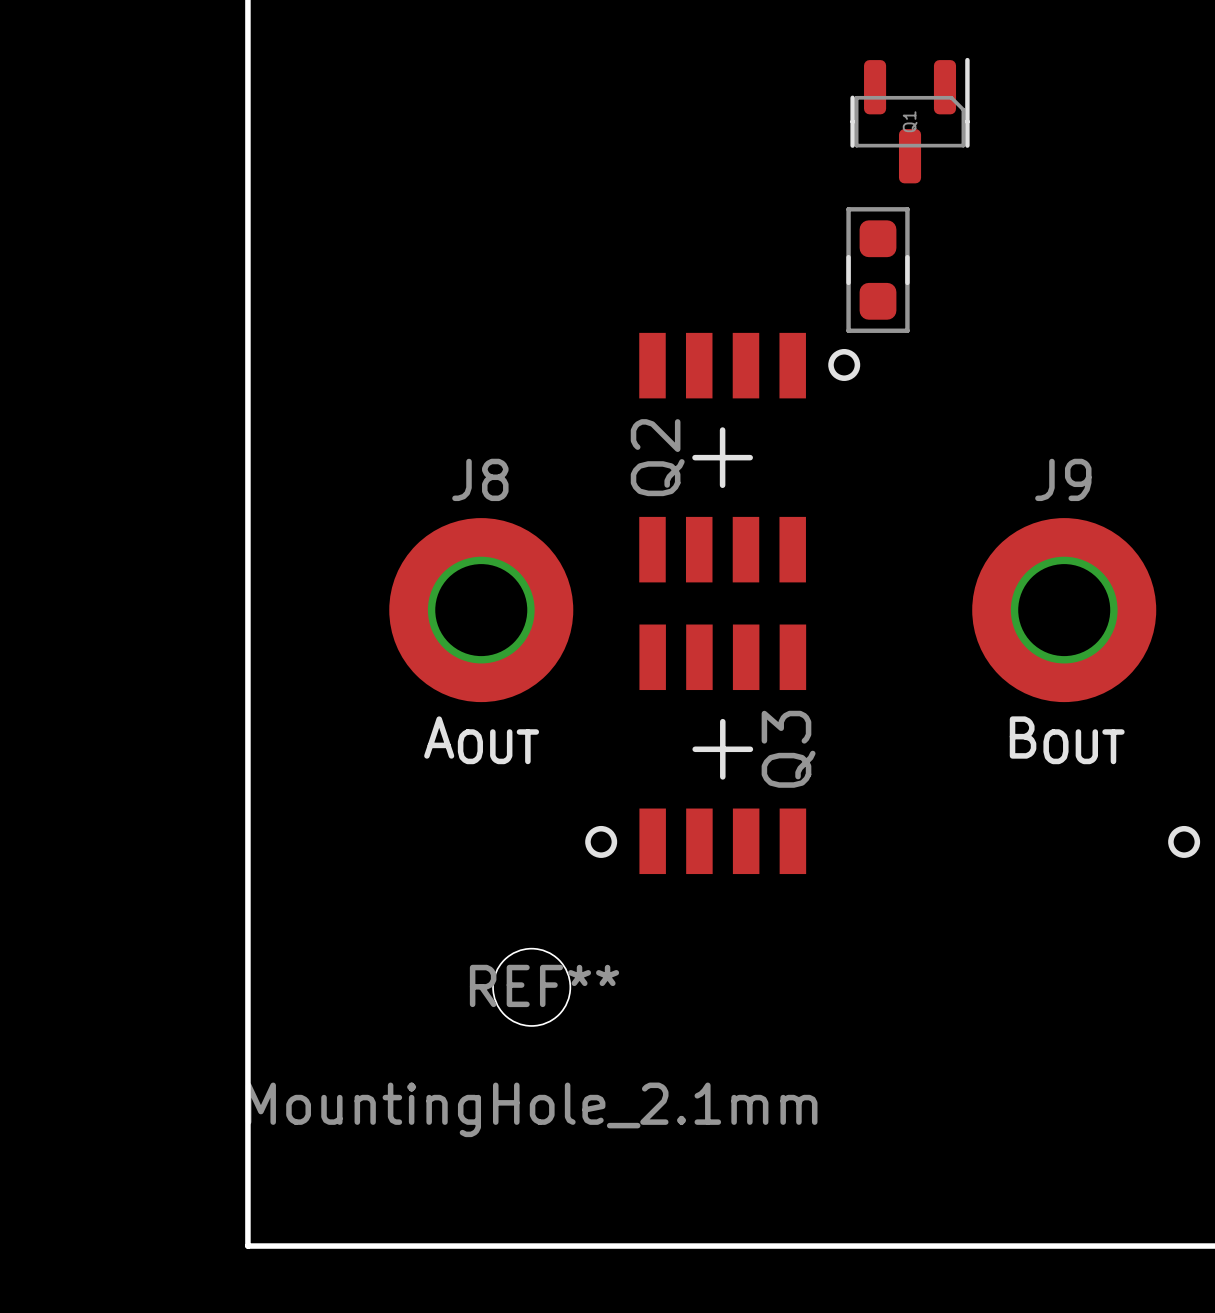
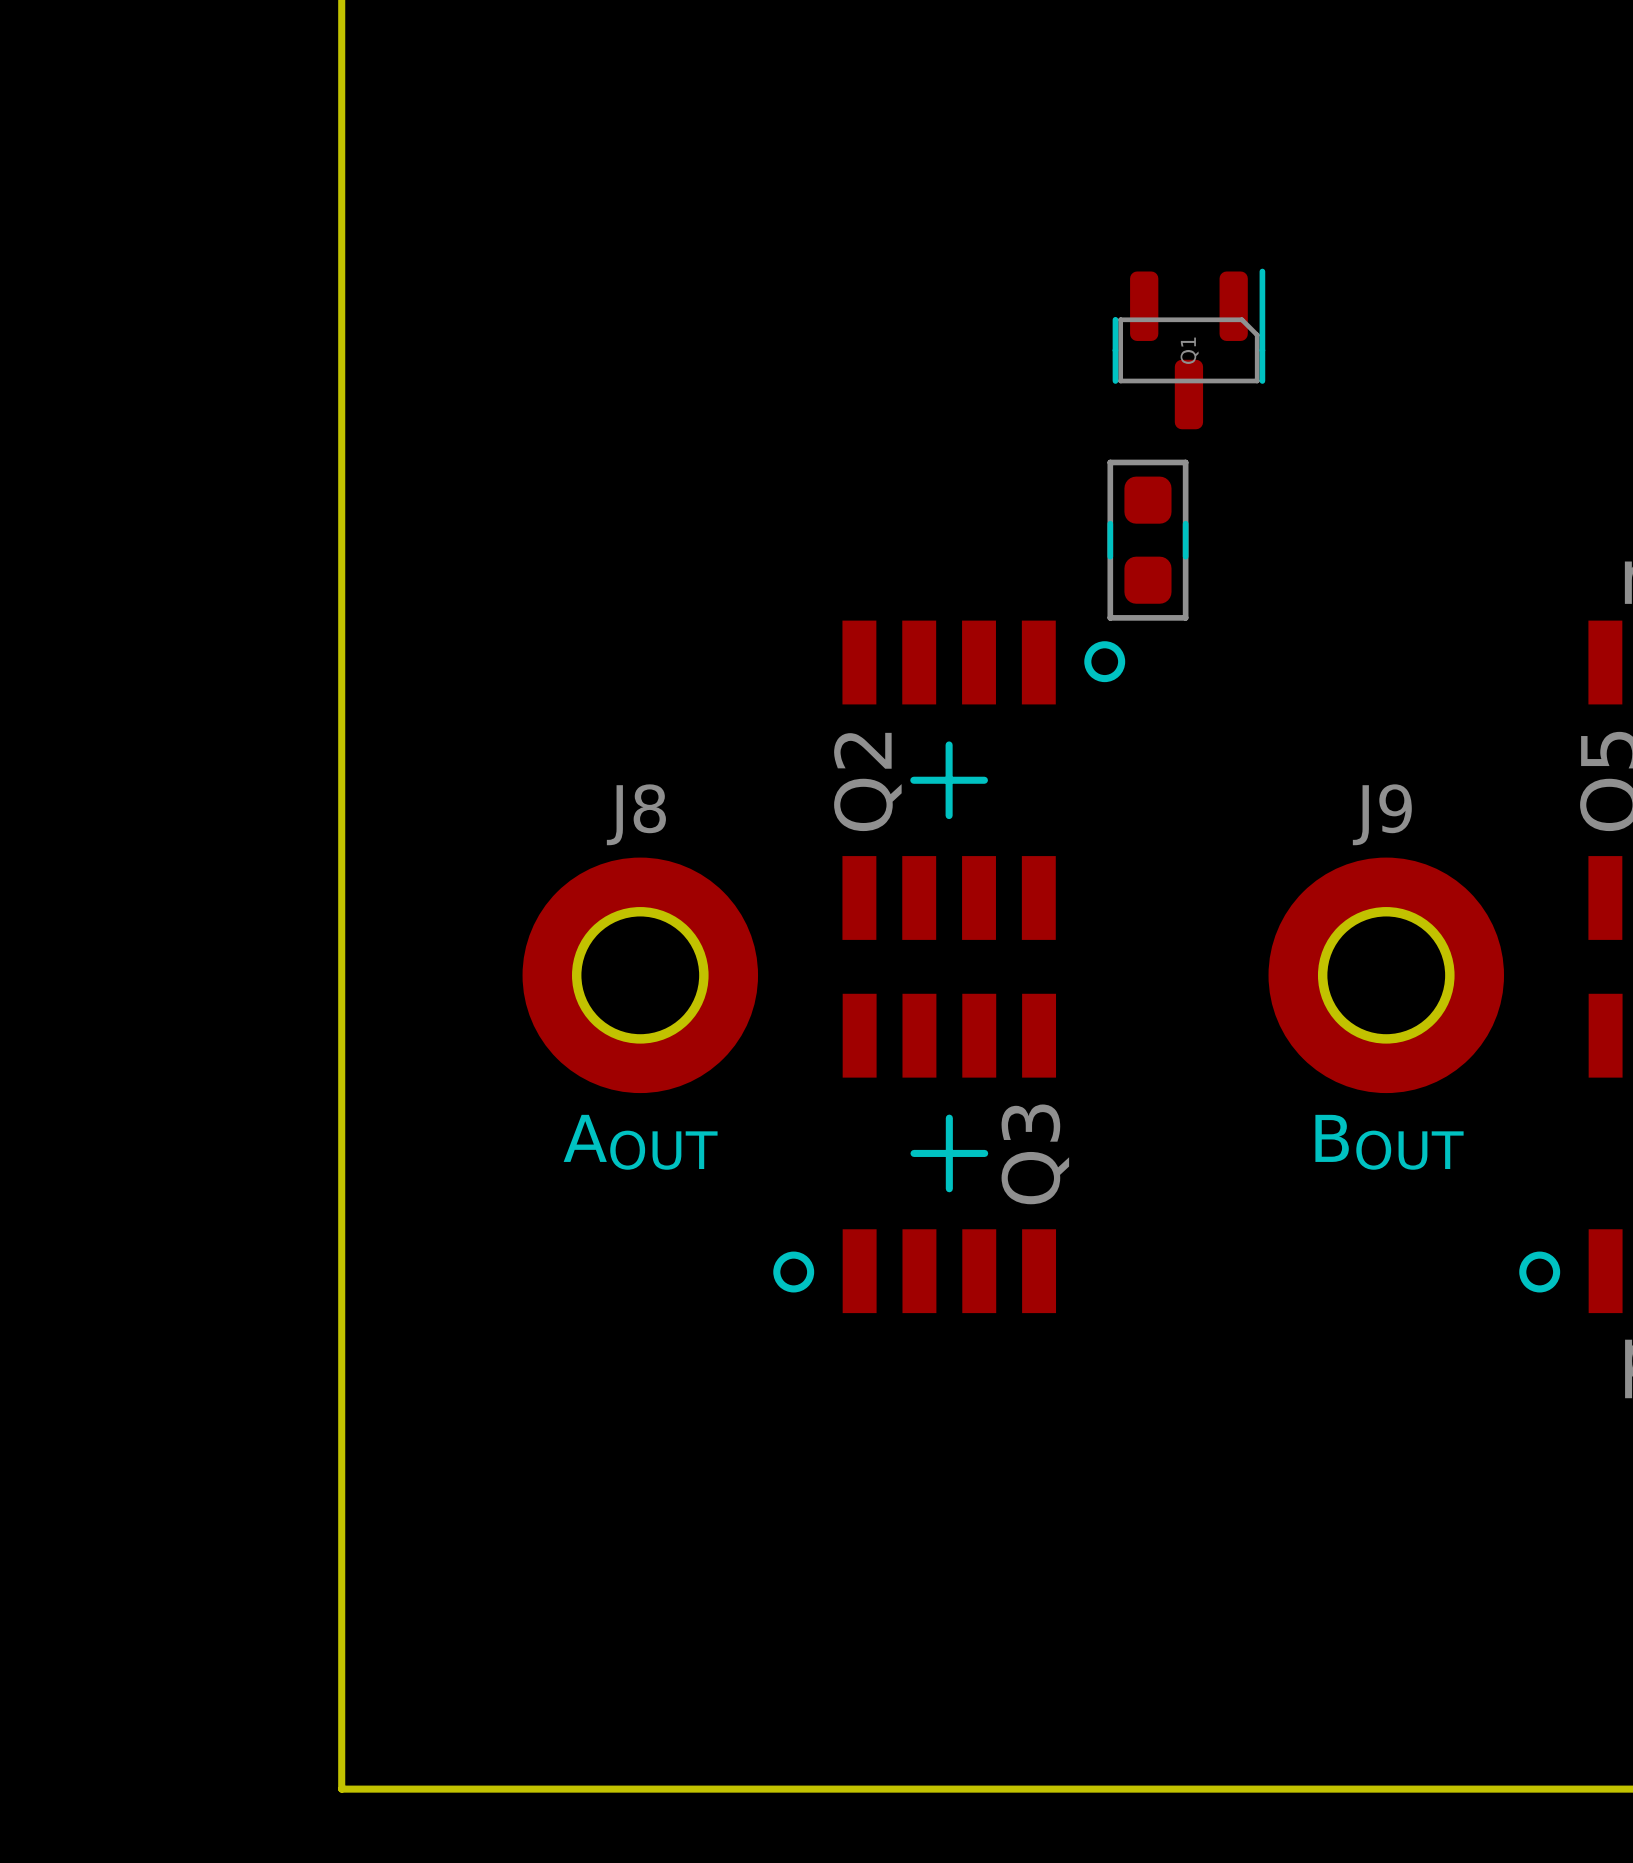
REF**: MountingHole_2.1mm (531, 987) -> none

